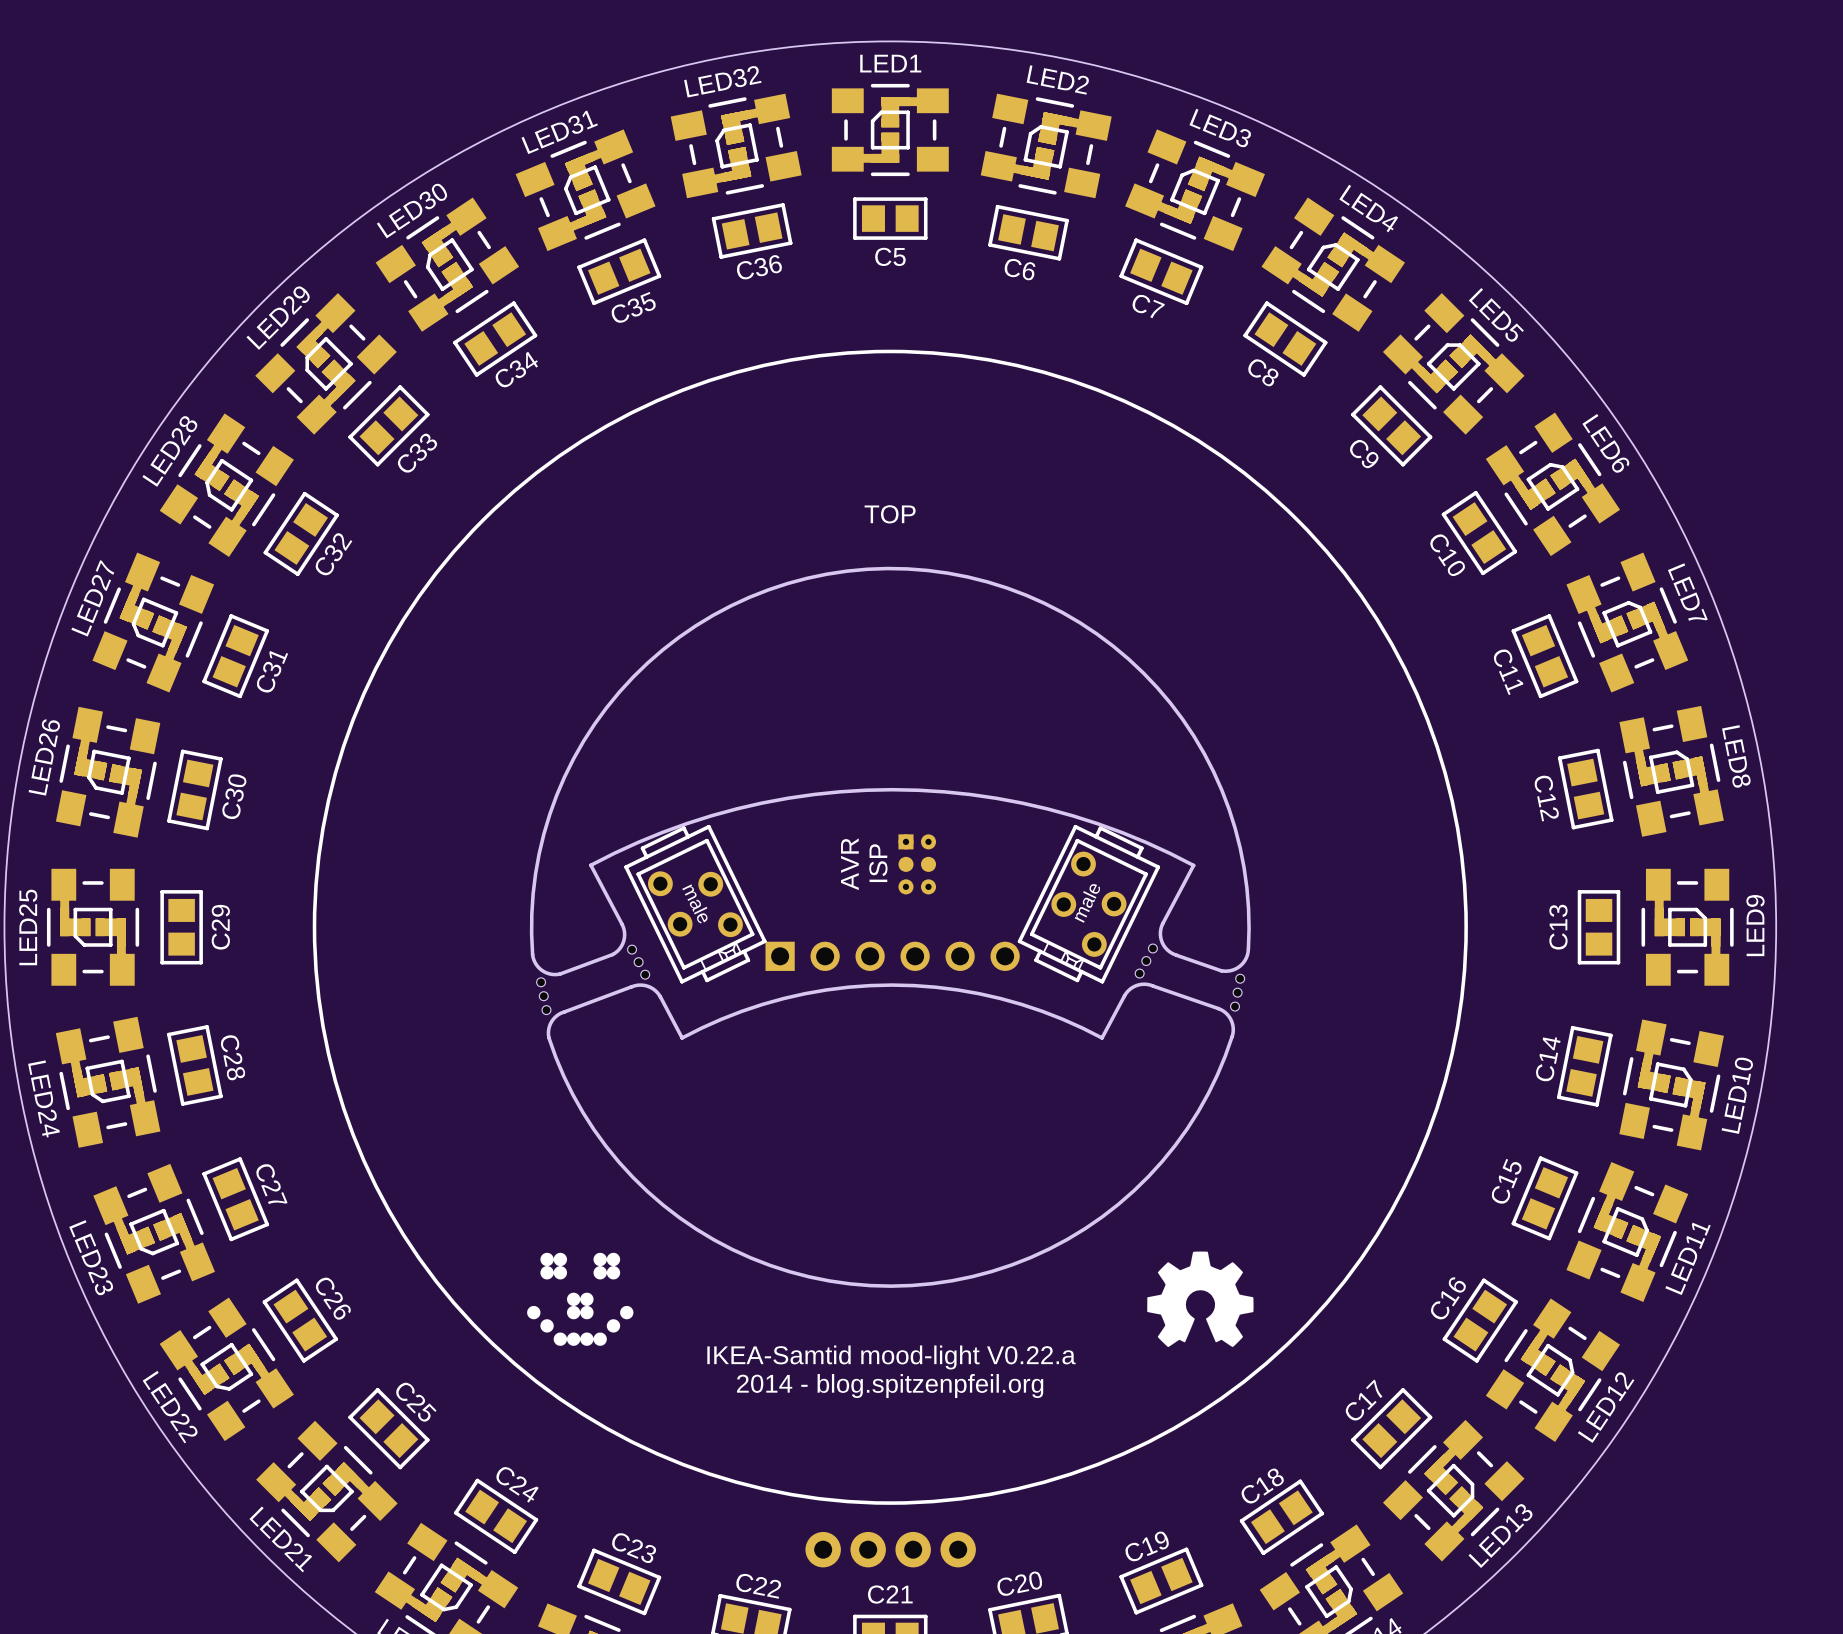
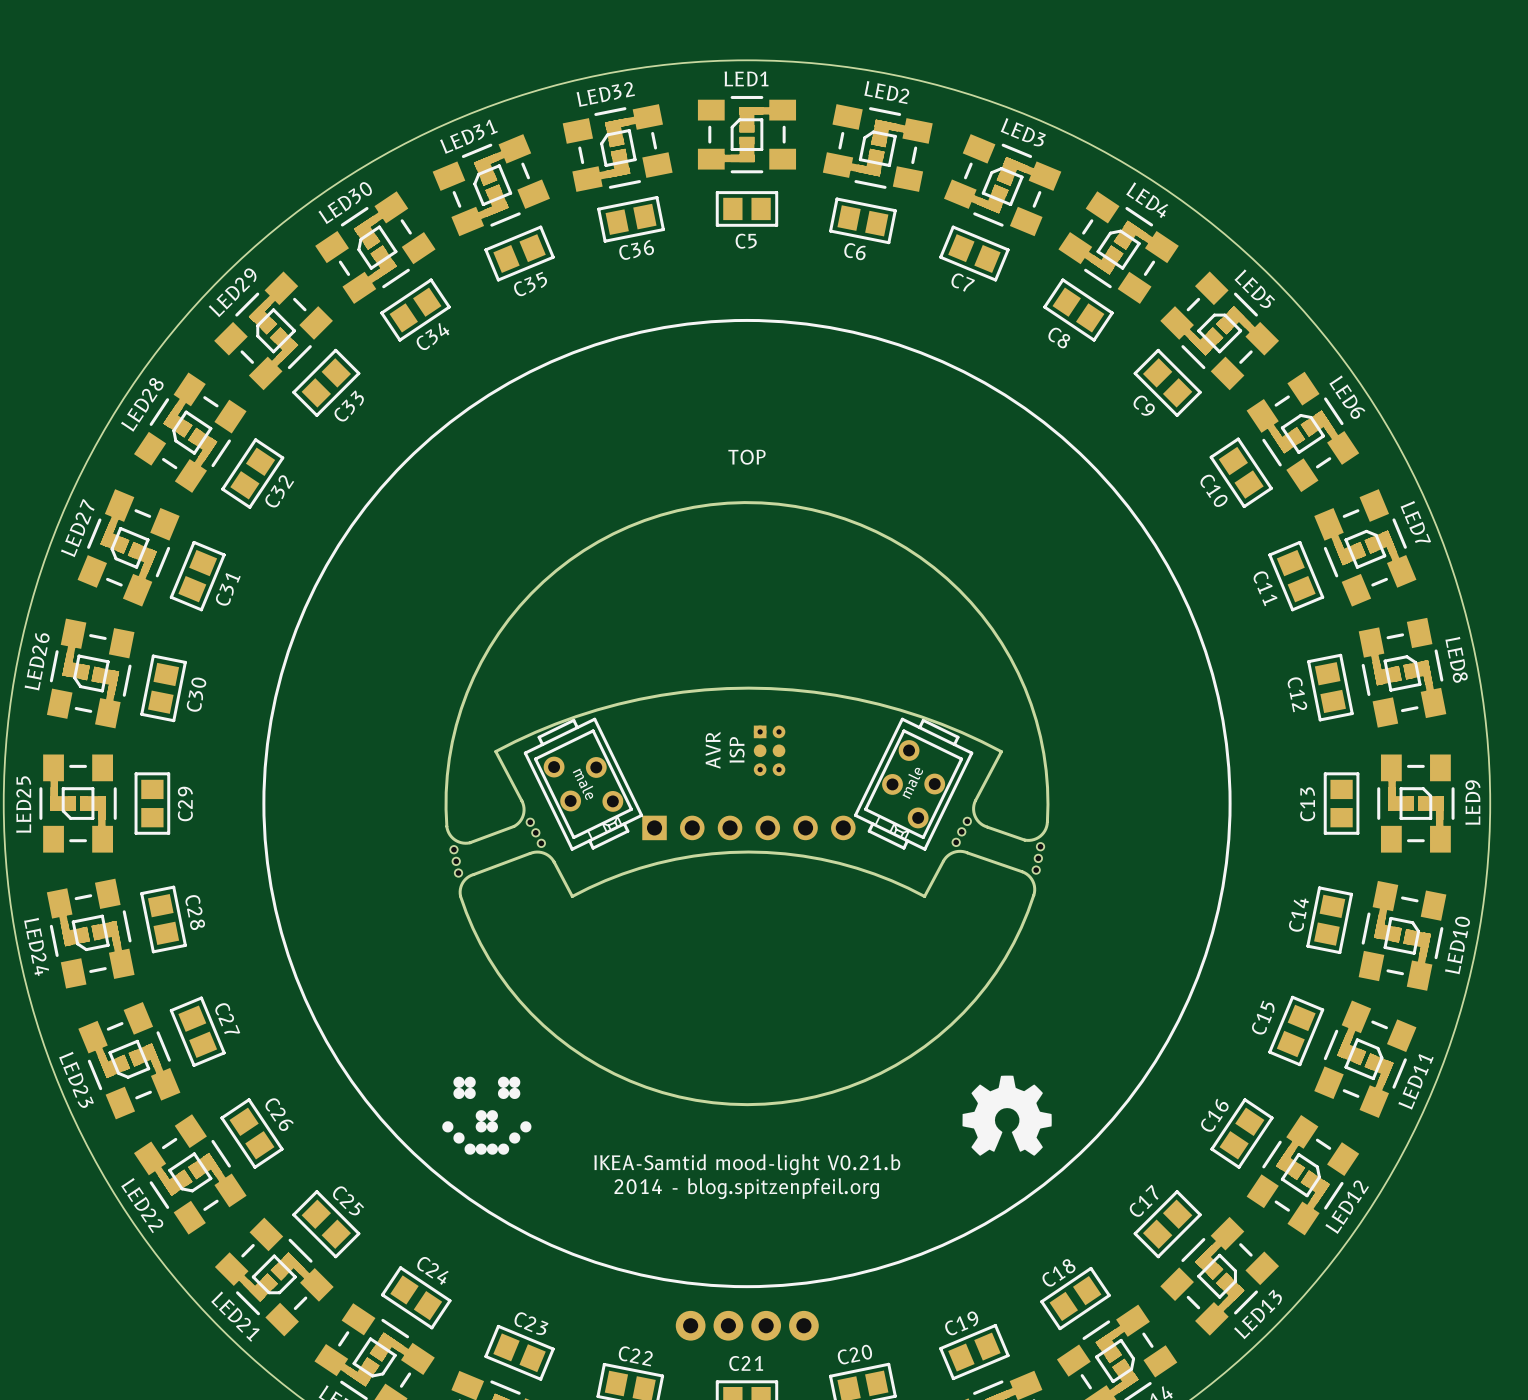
text: IKEA-Samtid mood-light V0.22.a (891, 1357) -> IKEA-Samtid mood-light V0.21.b (747, 1164)

